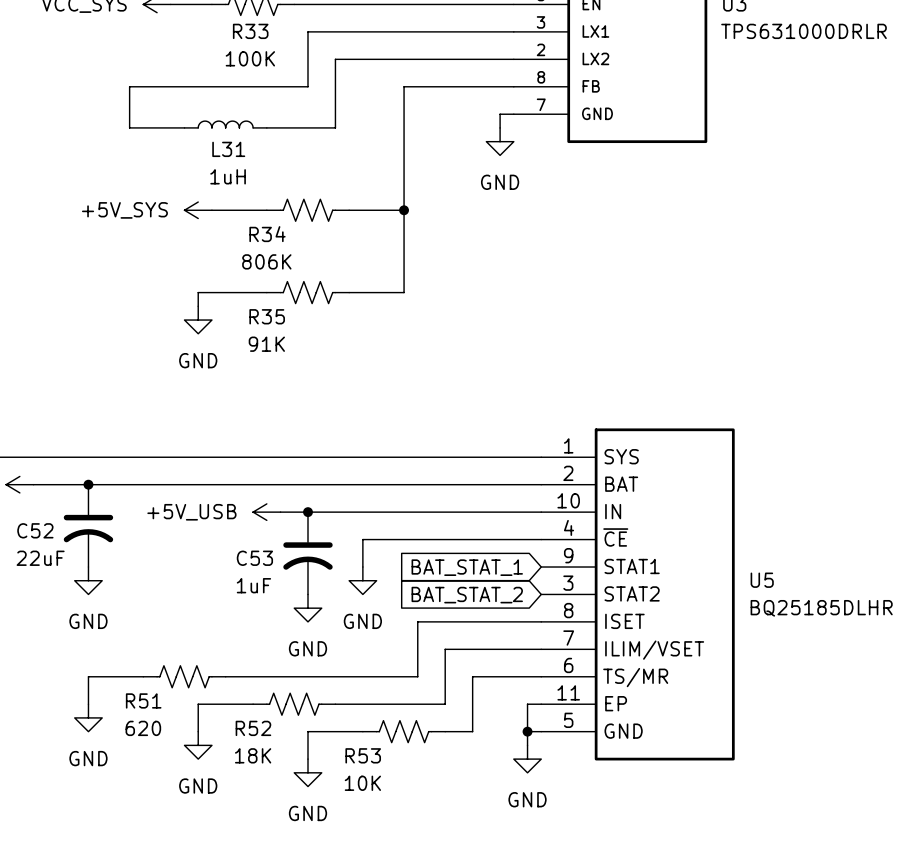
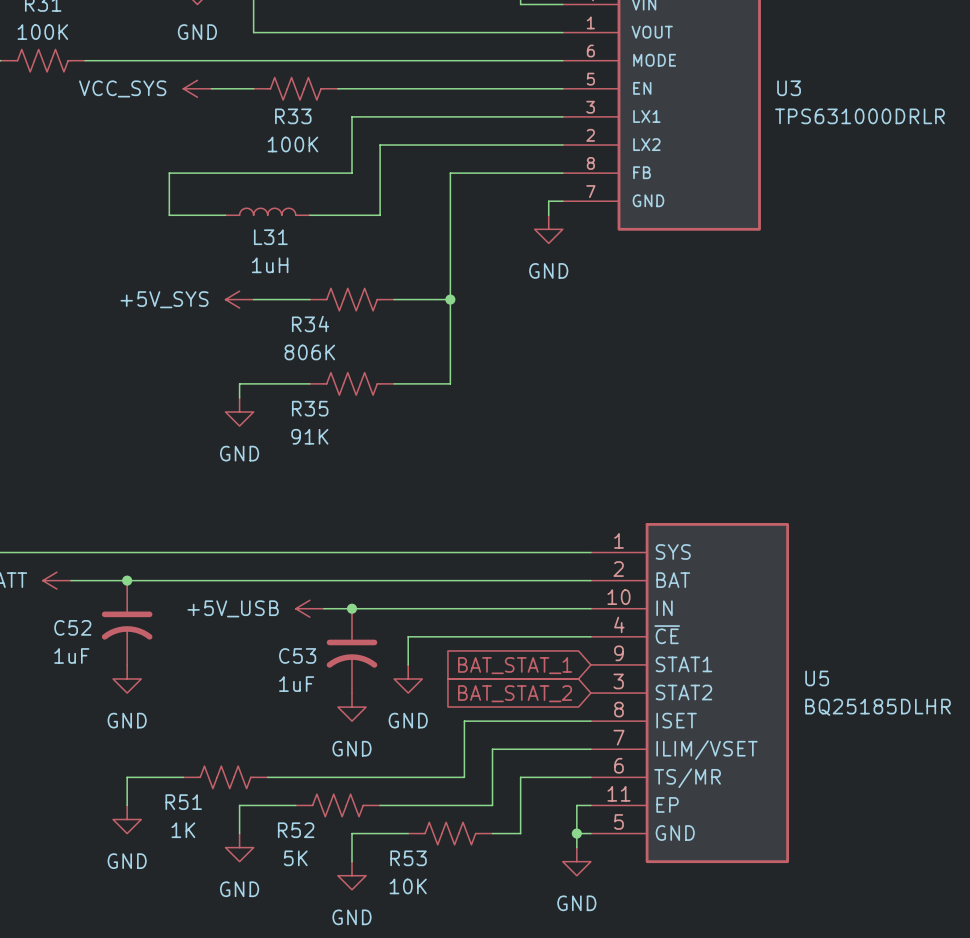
C52 value: 22uF (40, 558) -> 1uF (71, 655)
R51 value: 620 (143, 728) -> 1K (183, 830)
R52 value: 18K (253, 755) -> 5K (295, 858)

